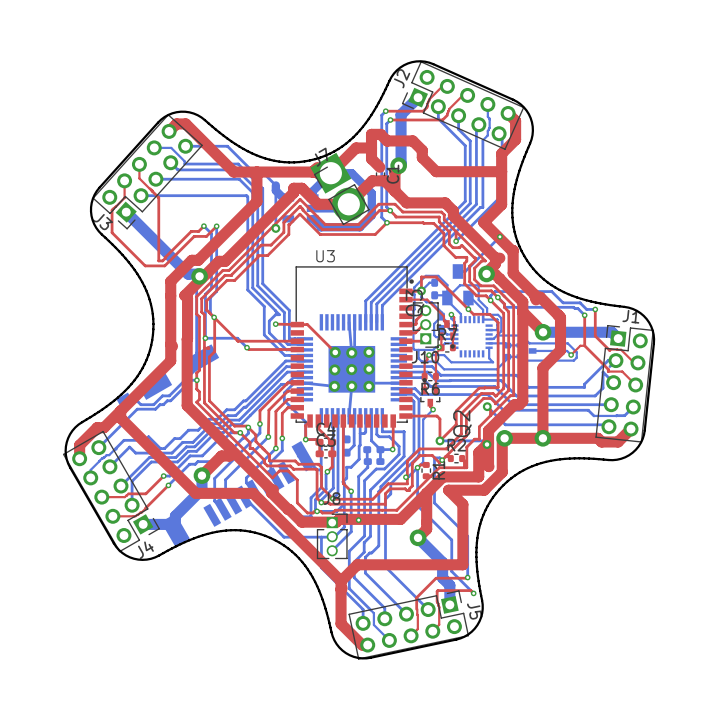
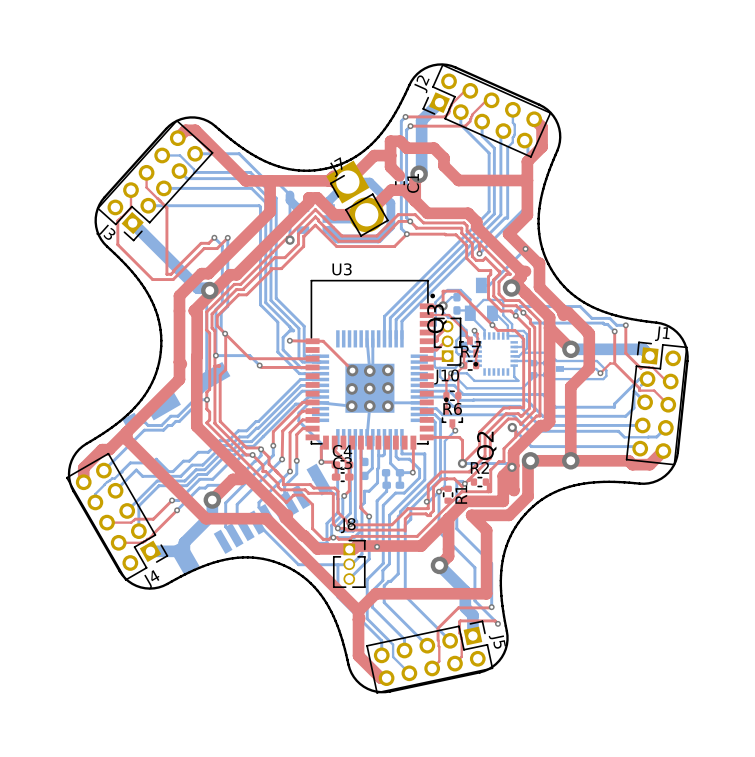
bottom track: none -> (355, 519) (356, 527) (353, 531) (340, 531) (337, 528)

